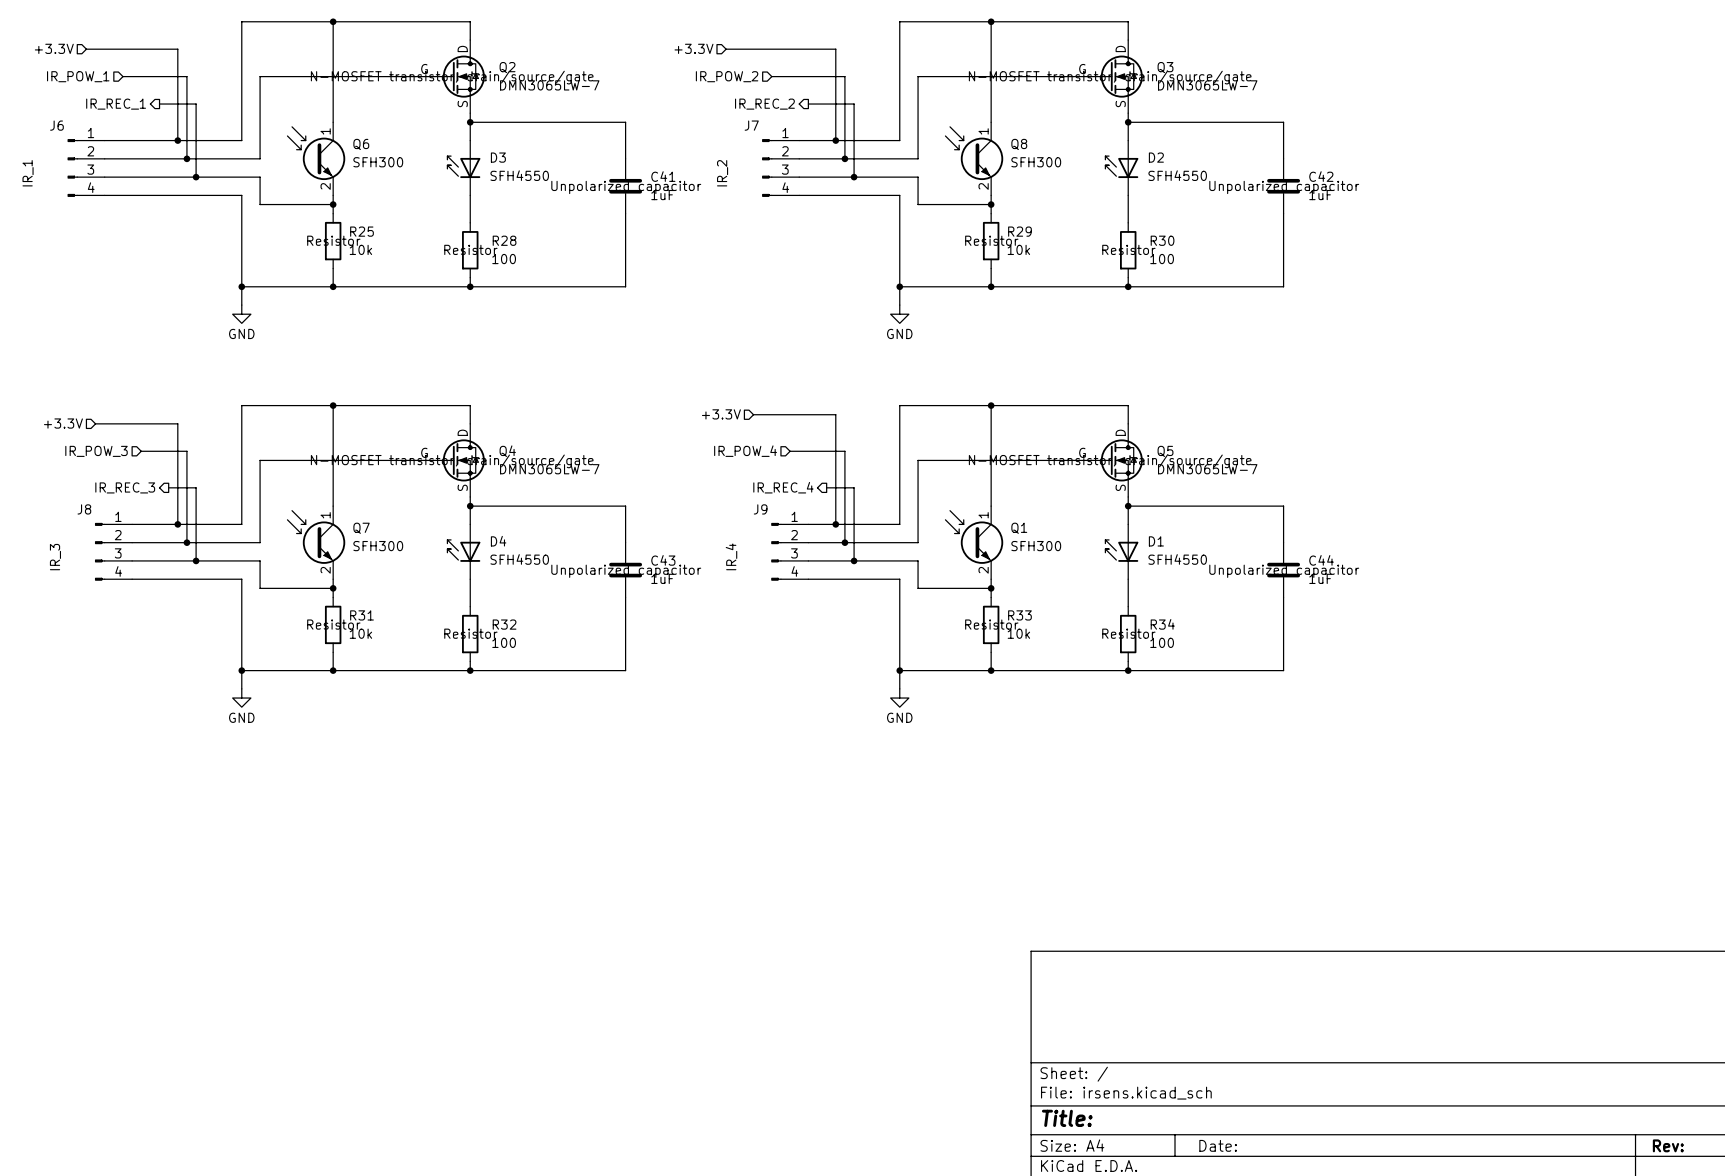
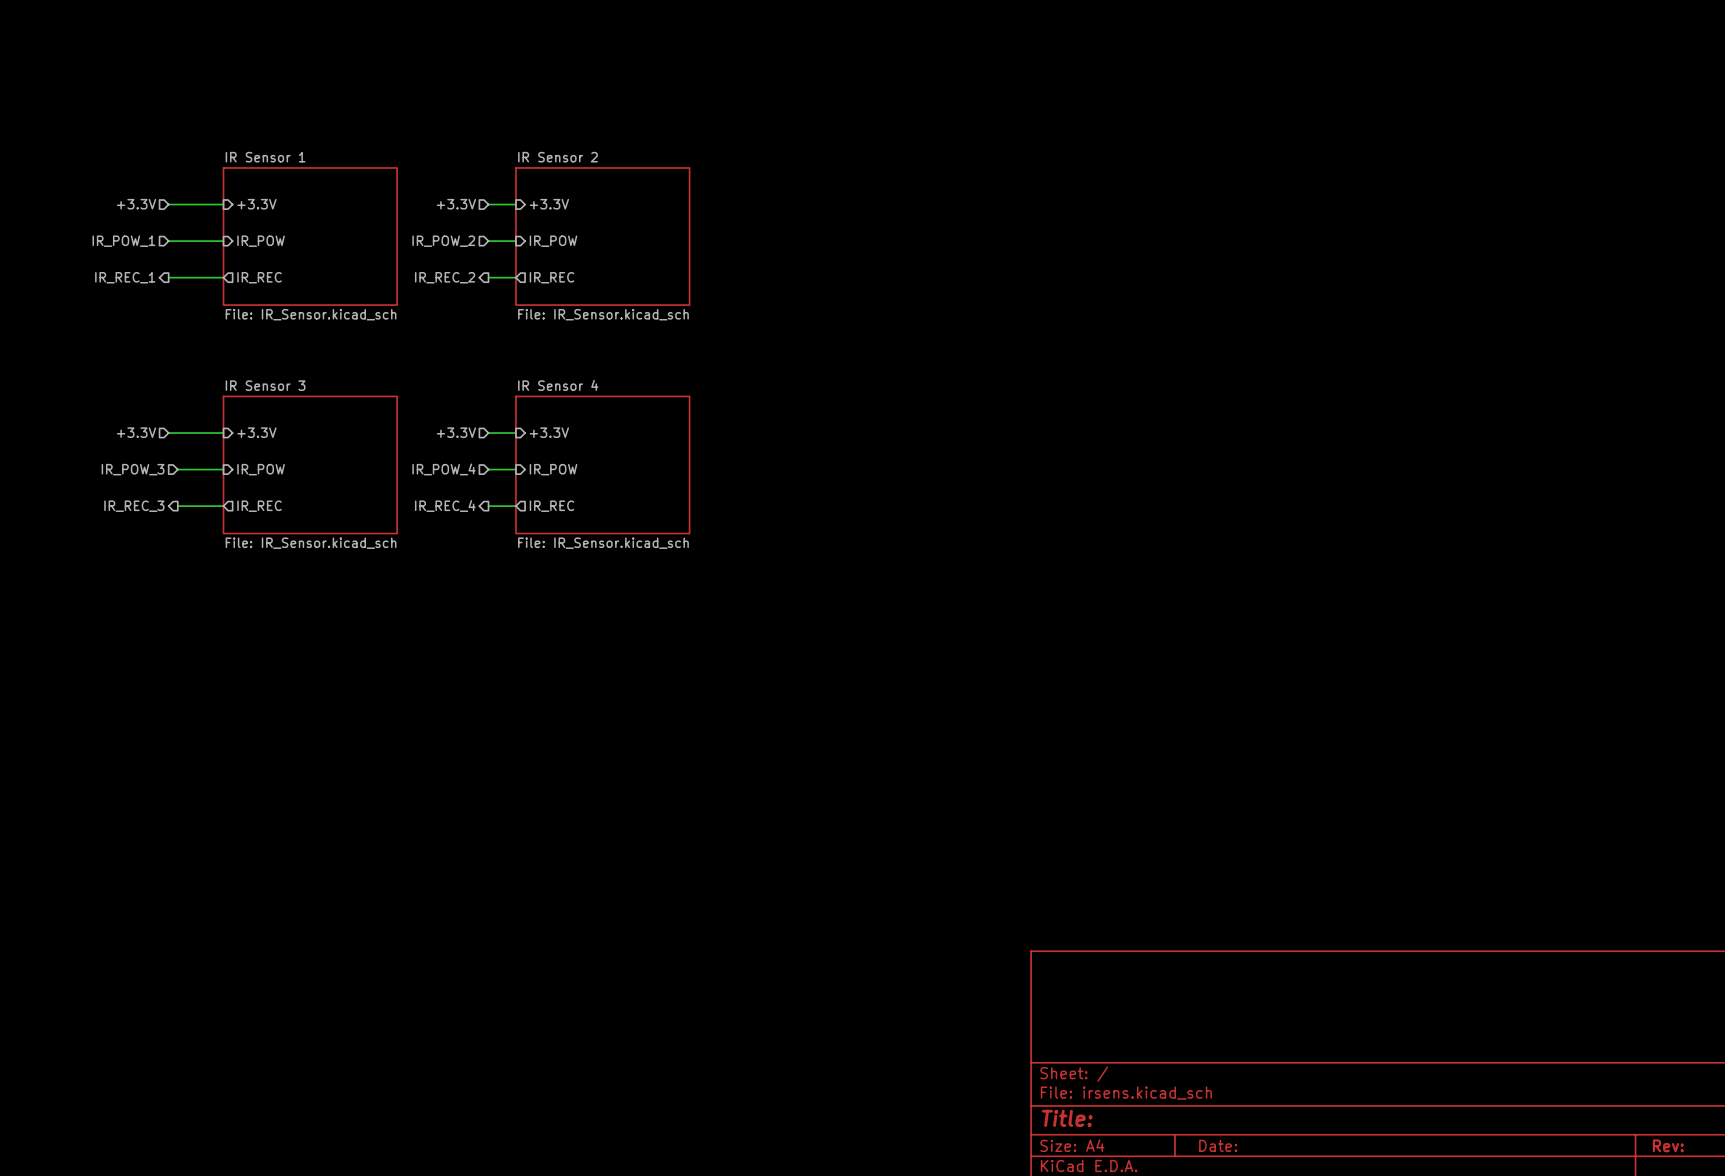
wire: (333, 21) (333, 122) -> none
junction: (333, 21) -> none
wire: (991, 21) (991, 122) -> none
junction: (991, 21) -> none
wire: (470, 40) (470, 21) (241, 21) (241, 140) (104, 140) -> none
wire: (1128, 40) (1128, 21) (899, 21) (899, 140) (799, 140) -> none
hierarchical label: +3.3V (54, 48) -> none
hierarchical label: +3.3V (694, 48) -> none
wire: (86, 49) (177, 49) (177, 140) -> none
wire: (726, 49) (835, 49) (835, 140) -> none
hierarchical label position: IR_POW_1 (78, 76) -> IR_POW_1 (123, 241)
wire: (122, 76) (186, 76) (186, 158) -> none
wire: (415, 76) (260, 76) (260, 158) (104, 158) -> none
Q2: DMN3065LW-7 (450, 76) -> none
hierarchical label: IR_POW_2 (727, 76) -> none
wire: (771, 76) (844, 76) (844, 158) -> none
wire: (1073, 76) (918, 76) (918, 158) (799, 158) -> none
Q3: DMN3065LW-7 (1108, 76) -> none
hierarchical label position: IR_REC_1 (116, 104) -> IR_REC_1 (125, 277)
wire: (159, 104) (196, 104) (196, 177) -> none
hierarchical label: IR_REC_2 (764, 104) -> none
wire: (808, 104) (854, 104) (854, 177) -> none
wire: (470, 113) (470, 140) -> none
wire: (1128, 113) (1128, 140) -> none
wire: (470, 122) (625, 122) (625, 158) -> none
junction: (470, 122) -> none
wire: (1128, 122) (1283, 122) (1283, 158) -> none
junction: (1128, 122) -> none
junction: (177, 140) -> none
junction: (835, 140) -> none
junction: (186, 158) -> none
Q6: SFH300 (316, 158) -> none
junction: (844, 158) -> none
Q8: SFH300 (974, 158) -> none
J6: IR_1 (86, 167) -> none
D3: SFH4550 (463, 167) -> none
J7: IR_2 (780, 167) -> none
D2: SFH4550 (1121, 167) -> none
wire: (104, 177) (260, 177) (260, 204) (333, 204) -> none
junction: (196, 177) -> none
wire: (799, 177) (918, 177) (918, 204) (991, 204) -> none
junction: (854, 177) -> none
C41: 1uF (625, 186) -> none
C42: 1uF (1283, 186) -> none
wire: (104, 195) (241, 195) (241, 305) -> none
wire: (333, 195) (333, 213) -> none
wire: (470, 195) (470, 222) -> none
wire: (799, 195) (899, 195) (899, 305) -> none
wire: (991, 195) (991, 213) -> none
wire: (1128, 195) (1128, 222) -> none
hierarchical label: none -> +3.3V (136, 204)
wire: none -> (168, 204) (223, 204)
sheet pin: none -> +3.3V (256, 204)
junction: (333, 204) -> none
hierarchical label: none -> +3.3V (456, 204)
wire: none -> (488, 204) (515, 204)
sheet pin: none -> +3.3V (549, 204)
junction: (991, 204) -> none
wire: (625, 213) (625, 286) (241, 286) -> none
wire: (1283, 213) (1283, 286) (899, 286) -> none
sheet IR Sensor 1: none -> File: IR_Sensor.kicad_sch (310, 236)
sheet IR Sensor 2: none -> File: IR_Sensor.kicad_sch (602, 236)
wire: none -> (168, 241) (223, 241)
sheet pin: none -> IR_POW (261, 241)
R25: 10k (333, 241) -> none
hierarchical label: none -> IR_POW_2 (443, 241)
wire: none -> (488, 241) (515, 241)
sheet pin: none -> IR_POW (553, 241)
R29: 10k (991, 241) -> none
R28: 100 (470, 250) -> none
R30: 100 (1128, 250) -> none
wire: (333, 268) (333, 286) -> none
wire: (991, 268) (991, 286) -> none
wire: none -> (168, 277) (223, 277)
sheet pin: none -> IR_REC (259, 277)
hierarchical label: none -> IR_REC_2 (445, 277)
wire: (470, 277) (470, 286) -> none
wire: none -> (488, 277) (515, 277)
sheet pin: none -> IR_REC (551, 277)
wire: (1128, 277) (1128, 286) -> none
junction: (241, 286) -> none
junction: (333, 286) -> none
junction: (470, 286) -> none
junction: (899, 286) -> none
junction: (991, 286) -> none
junction: (1128, 286) -> none
power symbol: GND (241, 314) -> none
power symbol: GND (899, 314) -> none
wire: (333, 405) (333, 506) -> none
junction: (333, 405) -> none
wire: (991, 405) (991, 506) -> none
junction: (991, 405) -> none
hierarchical label: +3.3V (721, 414) -> none
wire: (753, 414) (835, 414) (835, 524) -> none
hierarchical label position: +3.3V (63, 423) -> +3.3V (136, 432)
wire: (95, 423) (177, 423) (177, 524) -> none
wire: (470, 423) (470, 405) (241, 405) (241, 524) (132, 524) -> none
wire: (1128, 423) (1128, 405) (899, 405) (899, 524) (808, 524) -> none
sheet pin: none -> +3.3V (256, 432)
hierarchical label: none -> +3.3V (456, 432)
sheet pin: none -> +3.3V (549, 432)
wire: none -> (168, 433) (223, 433)
wire: none -> (488, 433) (515, 433)
hierarchical label position: IR_POW_3 (96, 451) -> IR_POW_3 (133, 469)
wire: (141, 451) (186, 451) (186, 542) -> none
hierarchical label: IR_POW_4 (745, 451) -> none
wire: (790, 451) (844, 451) (844, 542) -> none
wire: (415, 460) (260, 460) (260, 542) (132, 542) -> none
Q4: DMN3065LW-7 (450, 460) -> none
wire: (1073, 460) (918, 460) (918, 542) (808, 542) -> none
Q5: DMN3065LW-7 (1108, 460) -> none
sheet IR Sensor 3: none -> File: IR_Sensor.kicad_sch (310, 464)
sheet IR Sensor 4: none -> File: IR_Sensor.kicad_sch (602, 464)
wire: none -> (177, 469) (223, 469)
sheet pin: none -> IR_POW (261, 469)
hierarchical label: none -> IR_POW_4 (443, 469)
wire: none -> (488, 469) (515, 469)
sheet pin: none -> IR_POW (553, 469)
hierarchical label position: IR_REC_3 (125, 487) -> IR_REC_3 (134, 506)
wire: (168, 487) (196, 487) (196, 560) -> none
hierarchical label: IR_REC_4 (783, 487) -> none
wire: (826, 487) (854, 487) (854, 560) -> none
wire: (470, 496) (470, 524) -> none
wire: (1128, 496) (1128, 524) -> none
hierarchical label: none -> IR_REC_4 (445, 505)
wire: none -> (177, 506) (223, 506)
sheet pin: none -> IR_REC (259, 506)
wire: (470, 506) (488, 506) -> none
junction: (470, 506) -> none
wire: (515, 506) (625, 506) (625, 542) -> none
sheet pin: none -> IR_REC (551, 506)
wire: (1128, 506) (1283, 506) (1283, 542) -> none
junction: (1128, 506) -> none
junction: (177, 524) -> none
junction: (835, 524) -> none
junction: (186, 542) -> none
Q7: SFH300 (316, 542) -> none
junction: (844, 542) -> none
Q1: SFH300 (974, 542) -> none
J8: IR_3 (113, 551) -> none
D4: SFH4550 (463, 551) -> none
J9: IR_4 (789, 551) -> none
D1: SFH4550 (1121, 551) -> none
wire: (132, 560) (260, 560) (260, 588) (333, 588) -> none
junction: (196, 560) -> none
wire: (808, 560) (918, 560) (918, 588) (991, 588) -> none
junction: (854, 560) -> none
C43: 1uF (625, 570) -> none
C44: 1uF (1283, 570) -> none
wire: (132, 579) (241, 579) (241, 688) -> none
wire: (333, 579) (333, 597) -> none
wire: (470, 579) (470, 606) -> none
wire: (808, 579) (899, 579) (899, 688) -> none
wire: (991, 579) (991, 597) -> none
wire: (1128, 579) (1128, 606) -> none
junction: (333, 588) -> none
junction: (991, 588) -> none
wire: (625, 597) (625, 670) (241, 670) -> none
wire: (1283, 597) (1283, 670) (899, 670) -> none
R31: 10k (333, 624) -> none
R33: 10k (991, 624) -> none
R32: 100 (470, 634) -> none
R34: 100 (1128, 634) -> none
wire: (333, 652) (333, 670) -> none
wire: (991, 652) (991, 670) -> none
wire: (470, 661) (470, 670) -> none
wire: (1128, 661) (1128, 670) -> none
junction: (241, 670) -> none
junction: (333, 670) -> none
junction: (470, 670) -> none
junction: (899, 670) -> none
junction: (991, 670) -> none
junction: (1128, 670) -> none
power symbol: GND (241, 698) -> none
power symbol: GND (899, 698) -> none

